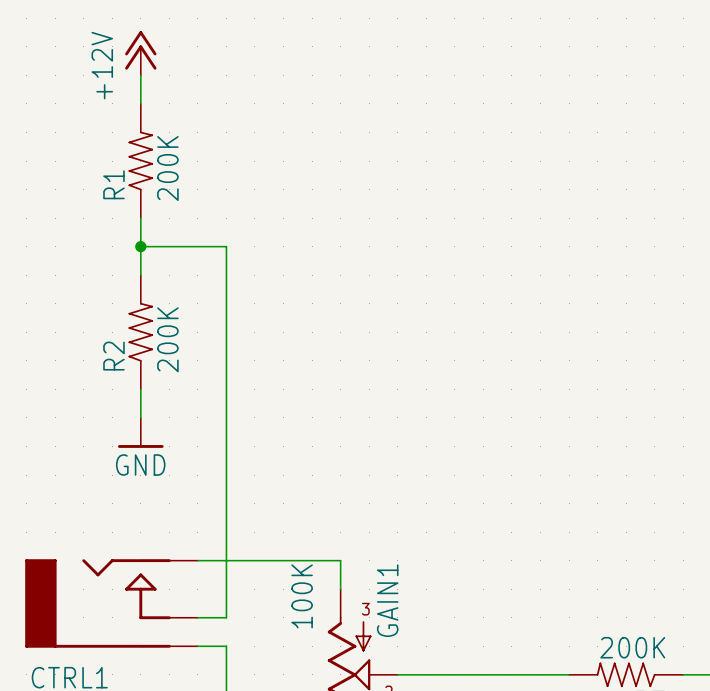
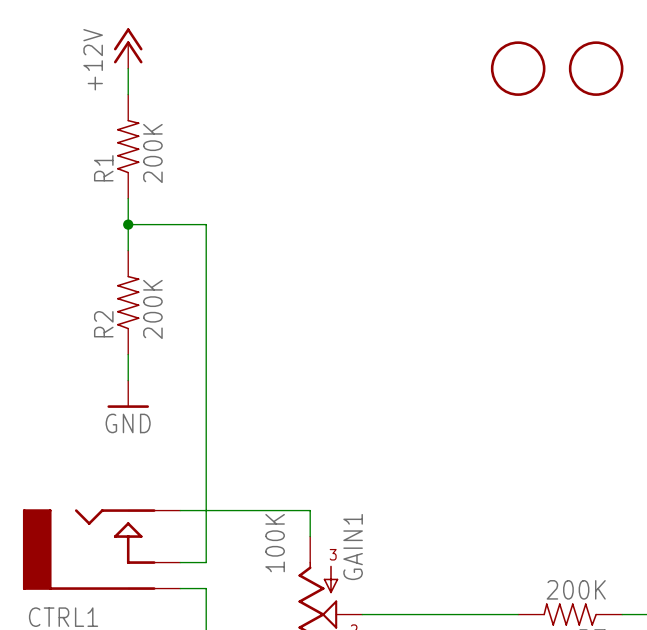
part: none -> (518, 68)
part: none -> (596, 68)

